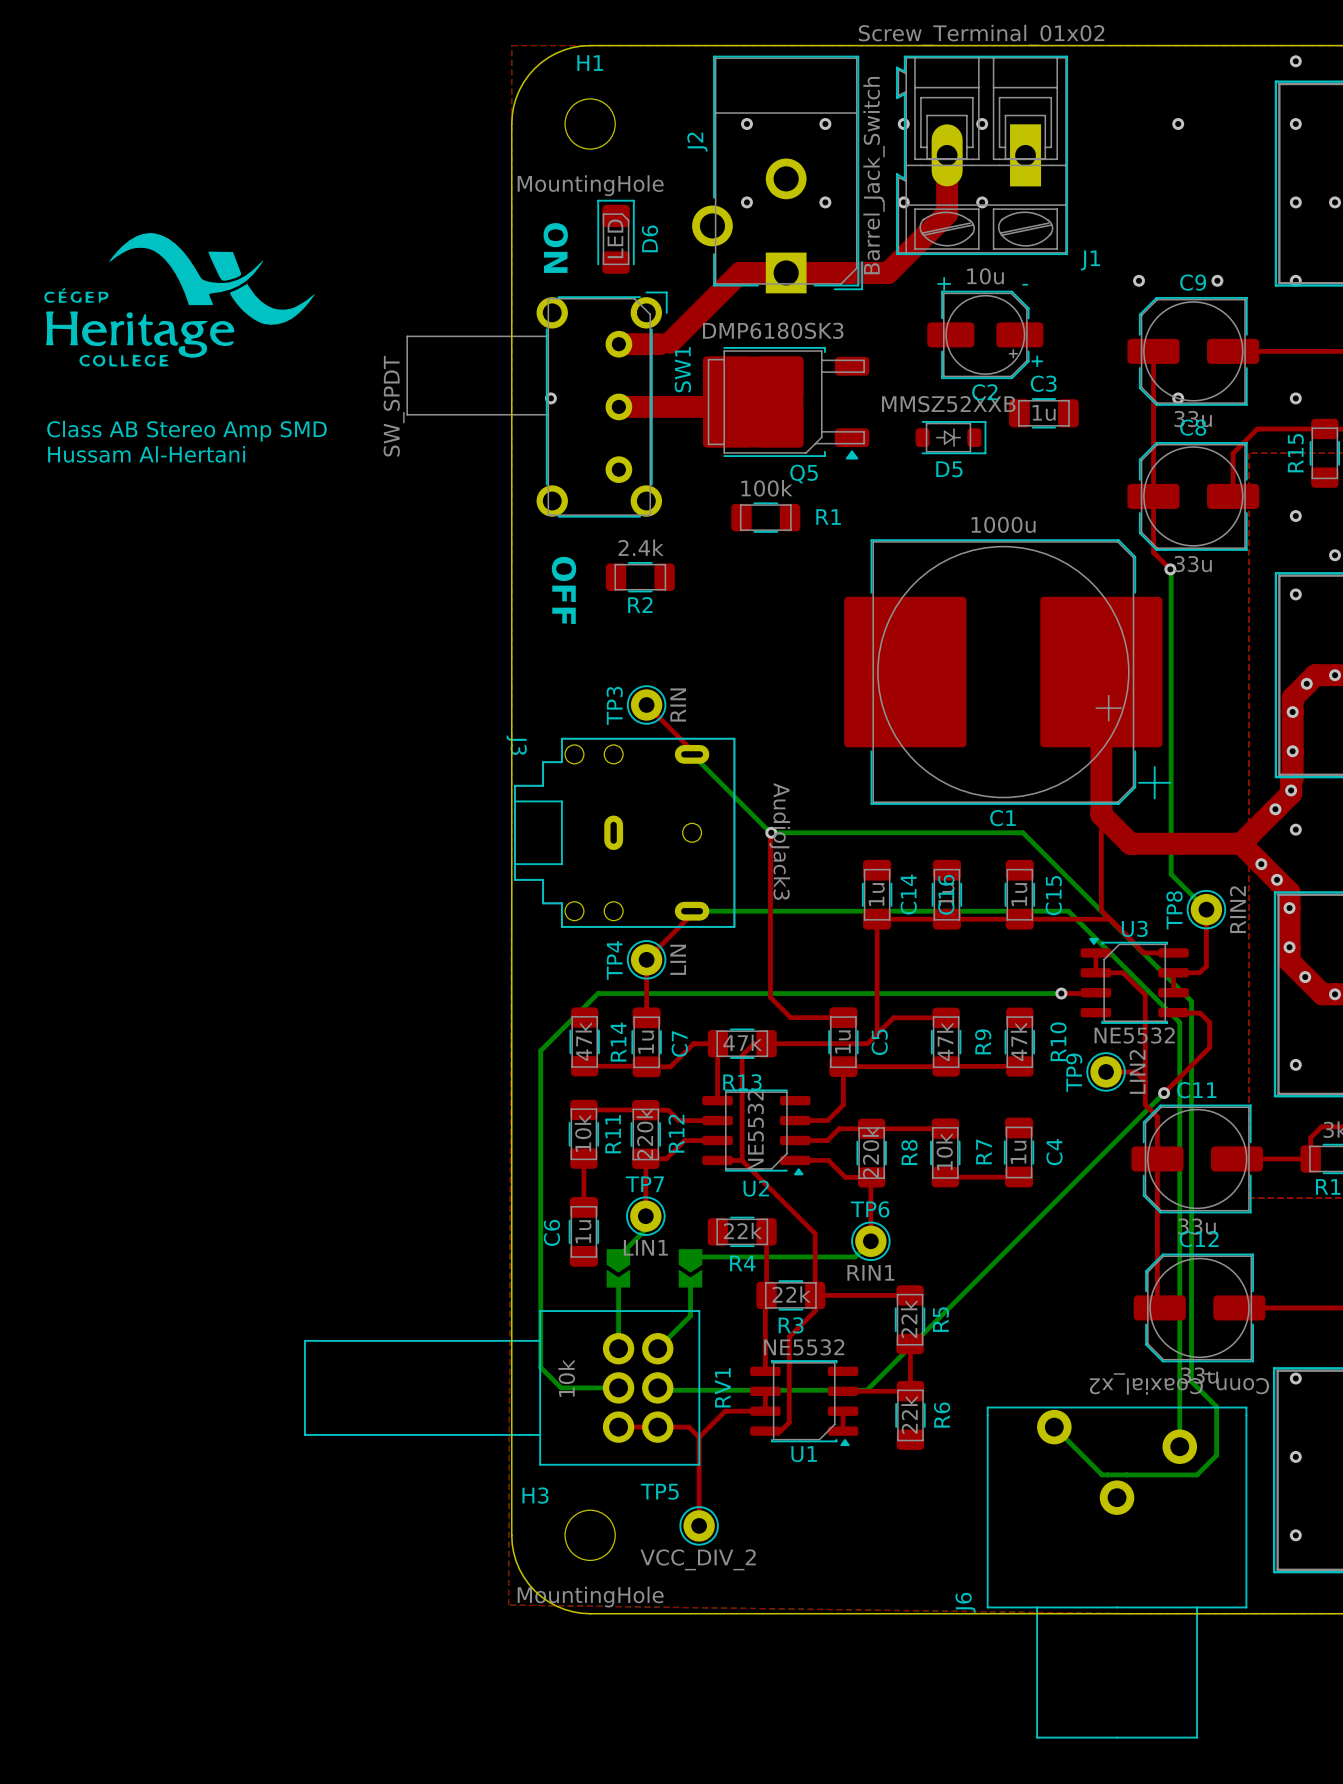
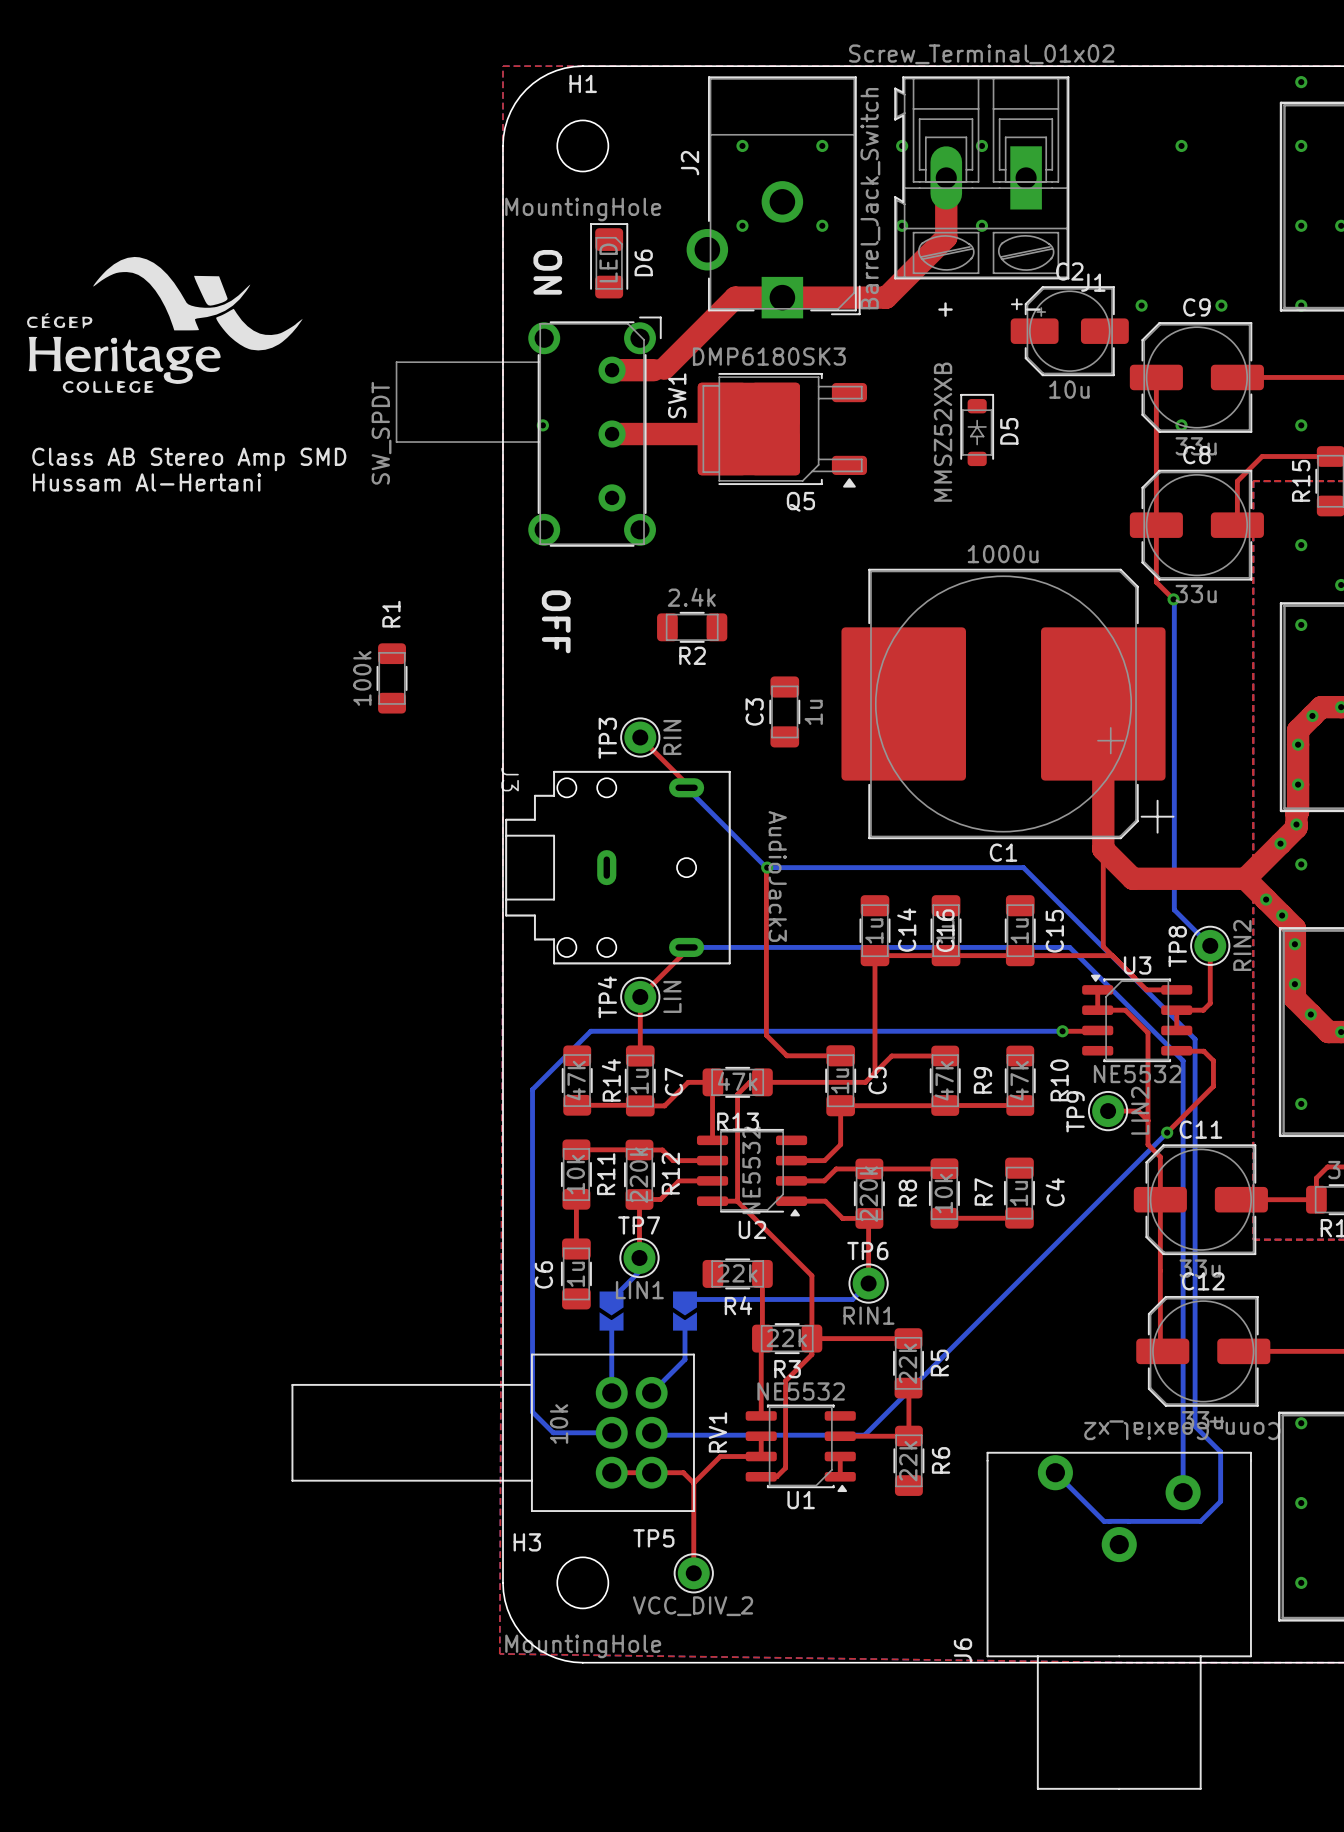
C2 rotation: 0° (985, 334) -> 180° (1069, 331)
C2 position: (985, 334) -> (1069, 331)
C3 name position: C3 (1043, 383) -> C3 (754, 711)
C3 rotation: 0° (1043, 413) -> 90° clockwise (784, 711)
C3 position: (1043, 413) -> (784, 711)
D5 rotation: 0° (950, 437) -> 90° counterclockwise (977, 430)
D5 position: (950, 437) -> (977, 430)
R1 value position: 100k (766, 488) -> 100k (362, 678)
R1 rotation: 0° (765, 517) -> 90° clockwise (392, 678)
R1 position: (765, 517) -> (392, 678)
R1 name position: R1 (828, 517) -> R1 (391, 614)
R2 position: (640, 577) -> (692, 627)

